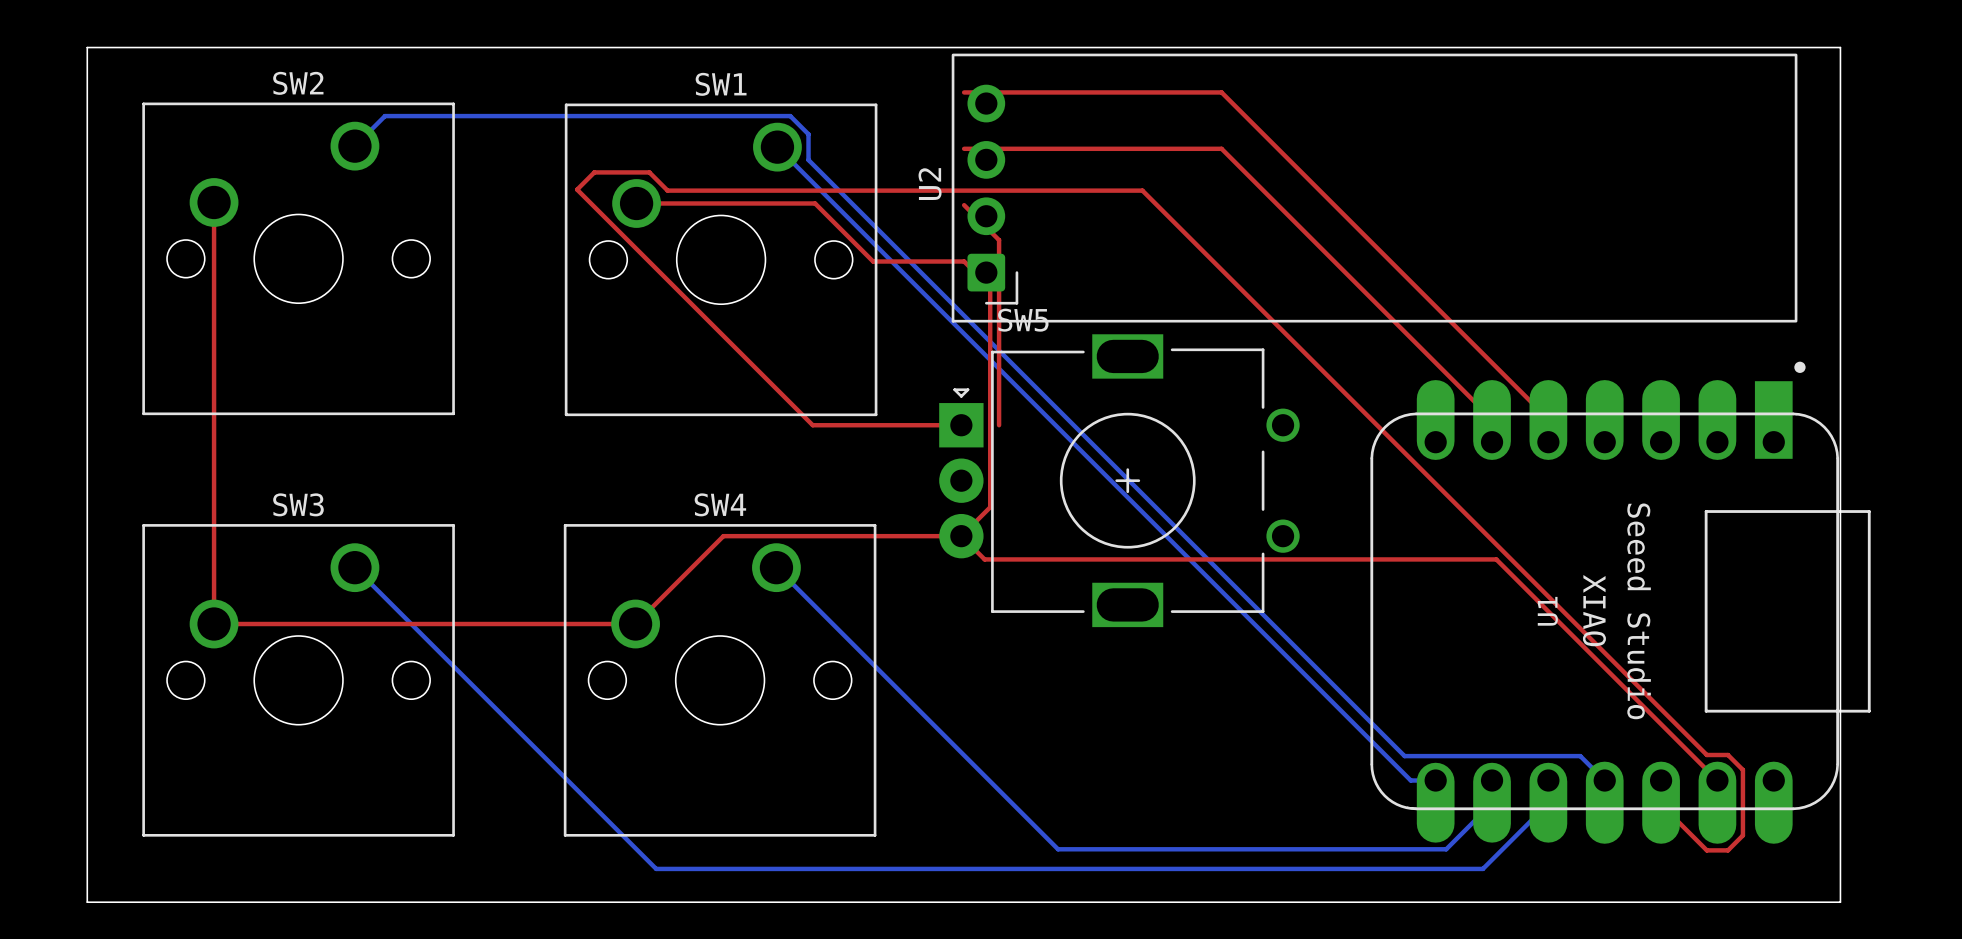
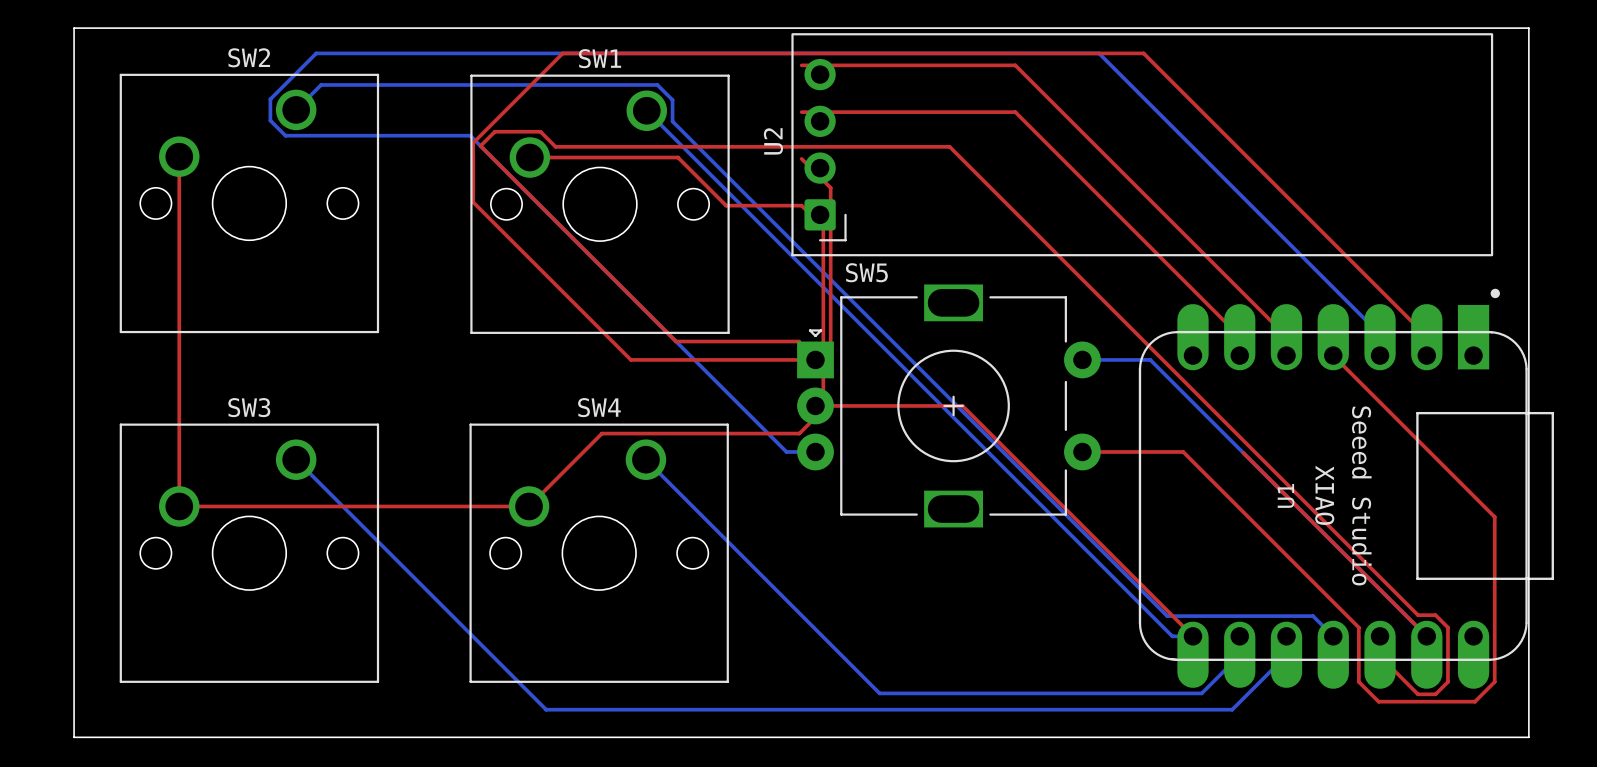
SW5 footprint: [939, 334, 1300, 628] -> [797, 284, 1101, 528]
top track: none -> (1333, 355) (1494, 517) (1494, 681) (1474, 701) (1378, 701) (1358, 681) (1358, 627) (1183, 451) (1082, 451)
bottom track: none -> (1380, 355) (1380, 334) (1099, 53) (316, 53) (270, 99) (270, 120) (285, 135) (470, 135) (786, 451) (815, 451)
top track: none -> (1426, 355) (1426, 336) (1143, 53) (562, 53) (473, 142) (473, 202) (630, 359) (815, 359)
bottom track: none -> (1082, 359) (1150, 359) (1426, 636)
top track: none -> (815, 405) (962, 405) (1192, 636)
top track: (961, 536) (984, 559) (1496, 559) -> none

